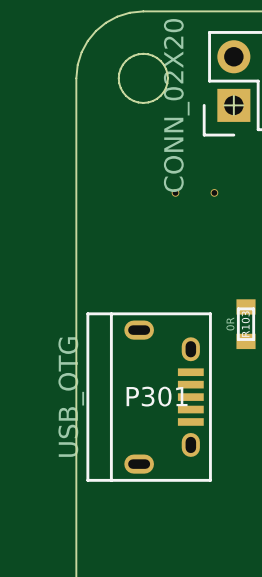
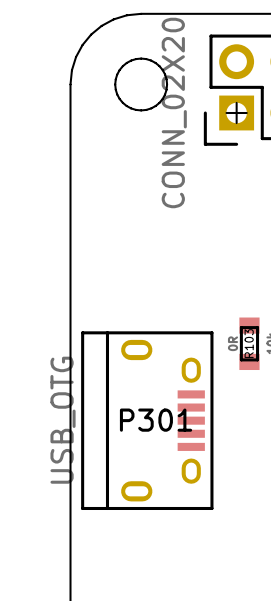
part: (175, 192) -> none
part: (214, 192) -> none

